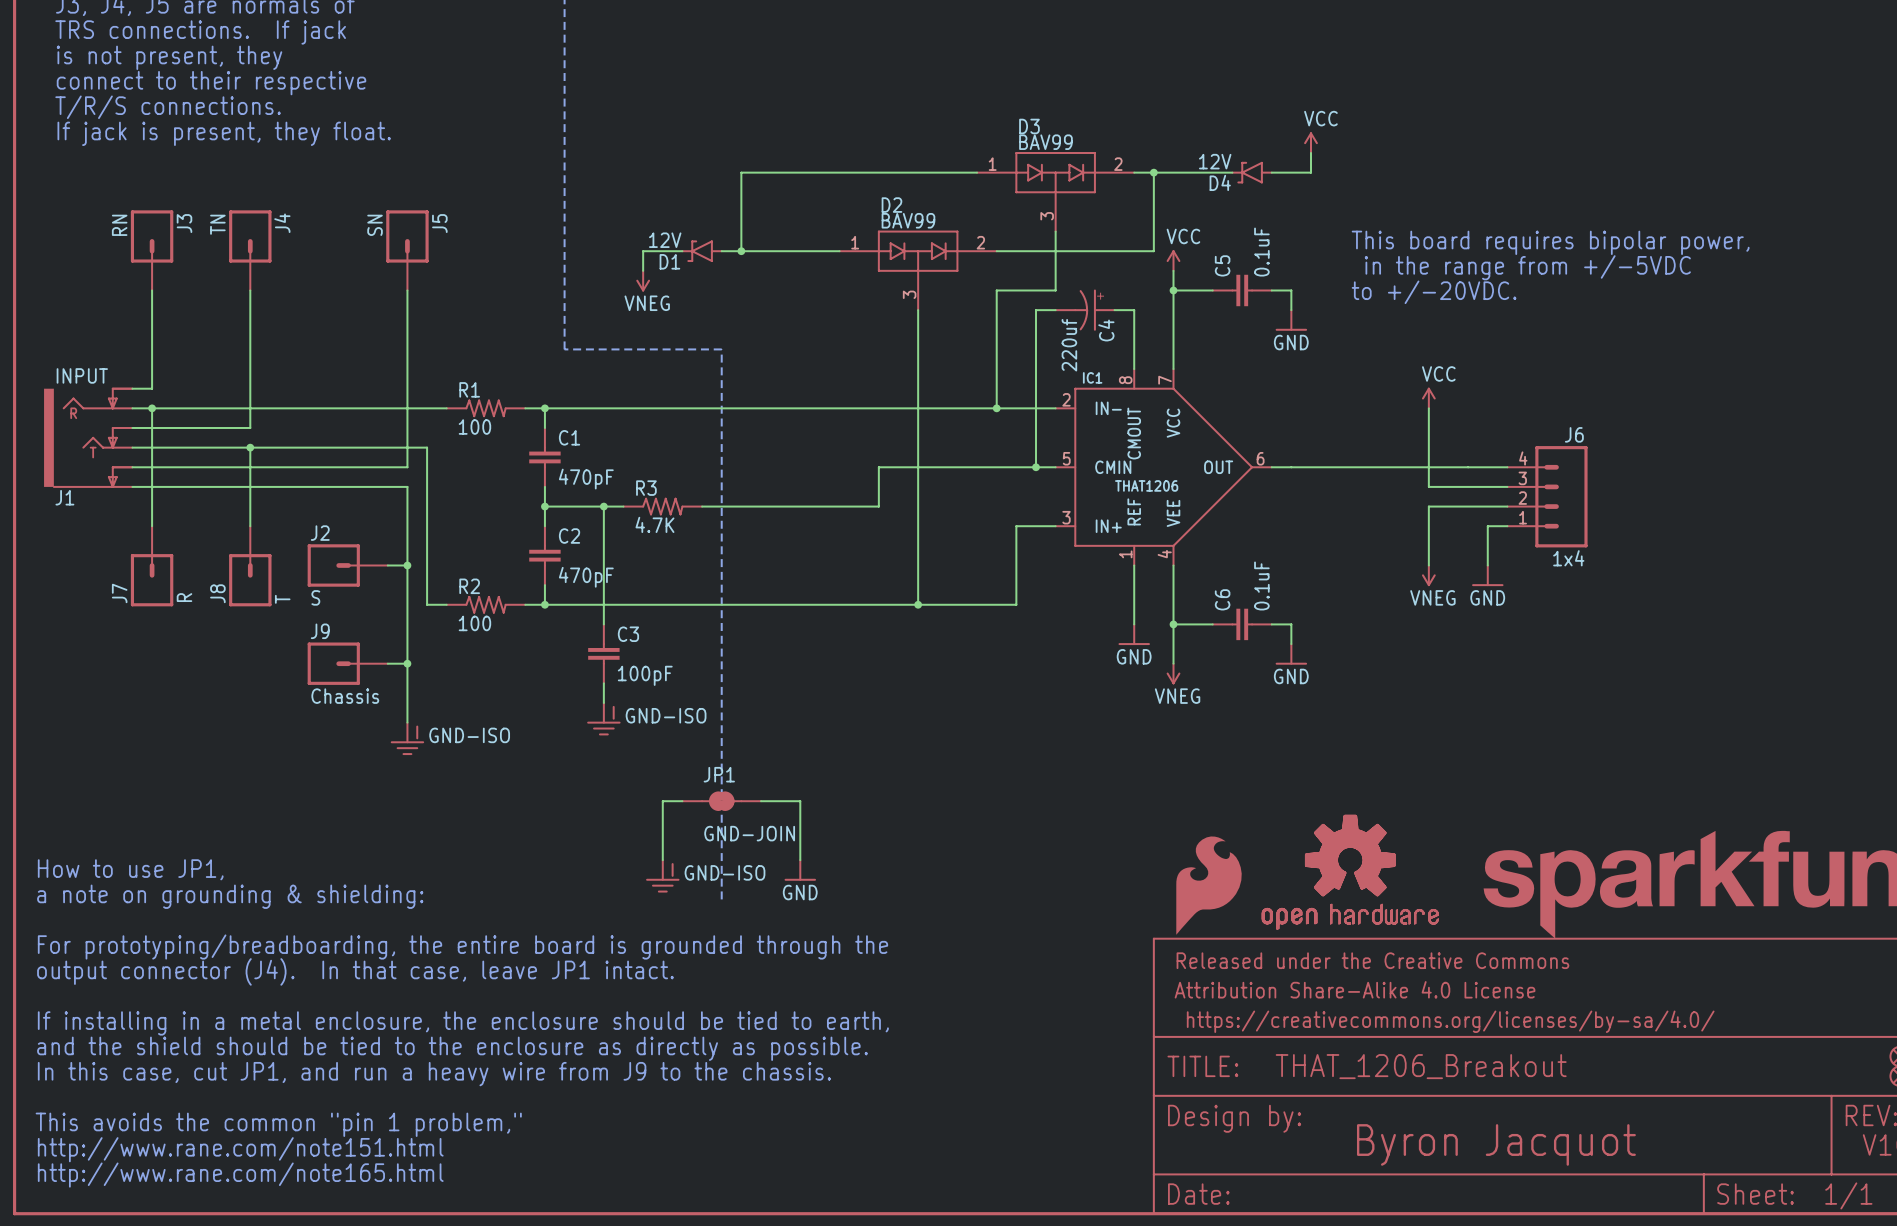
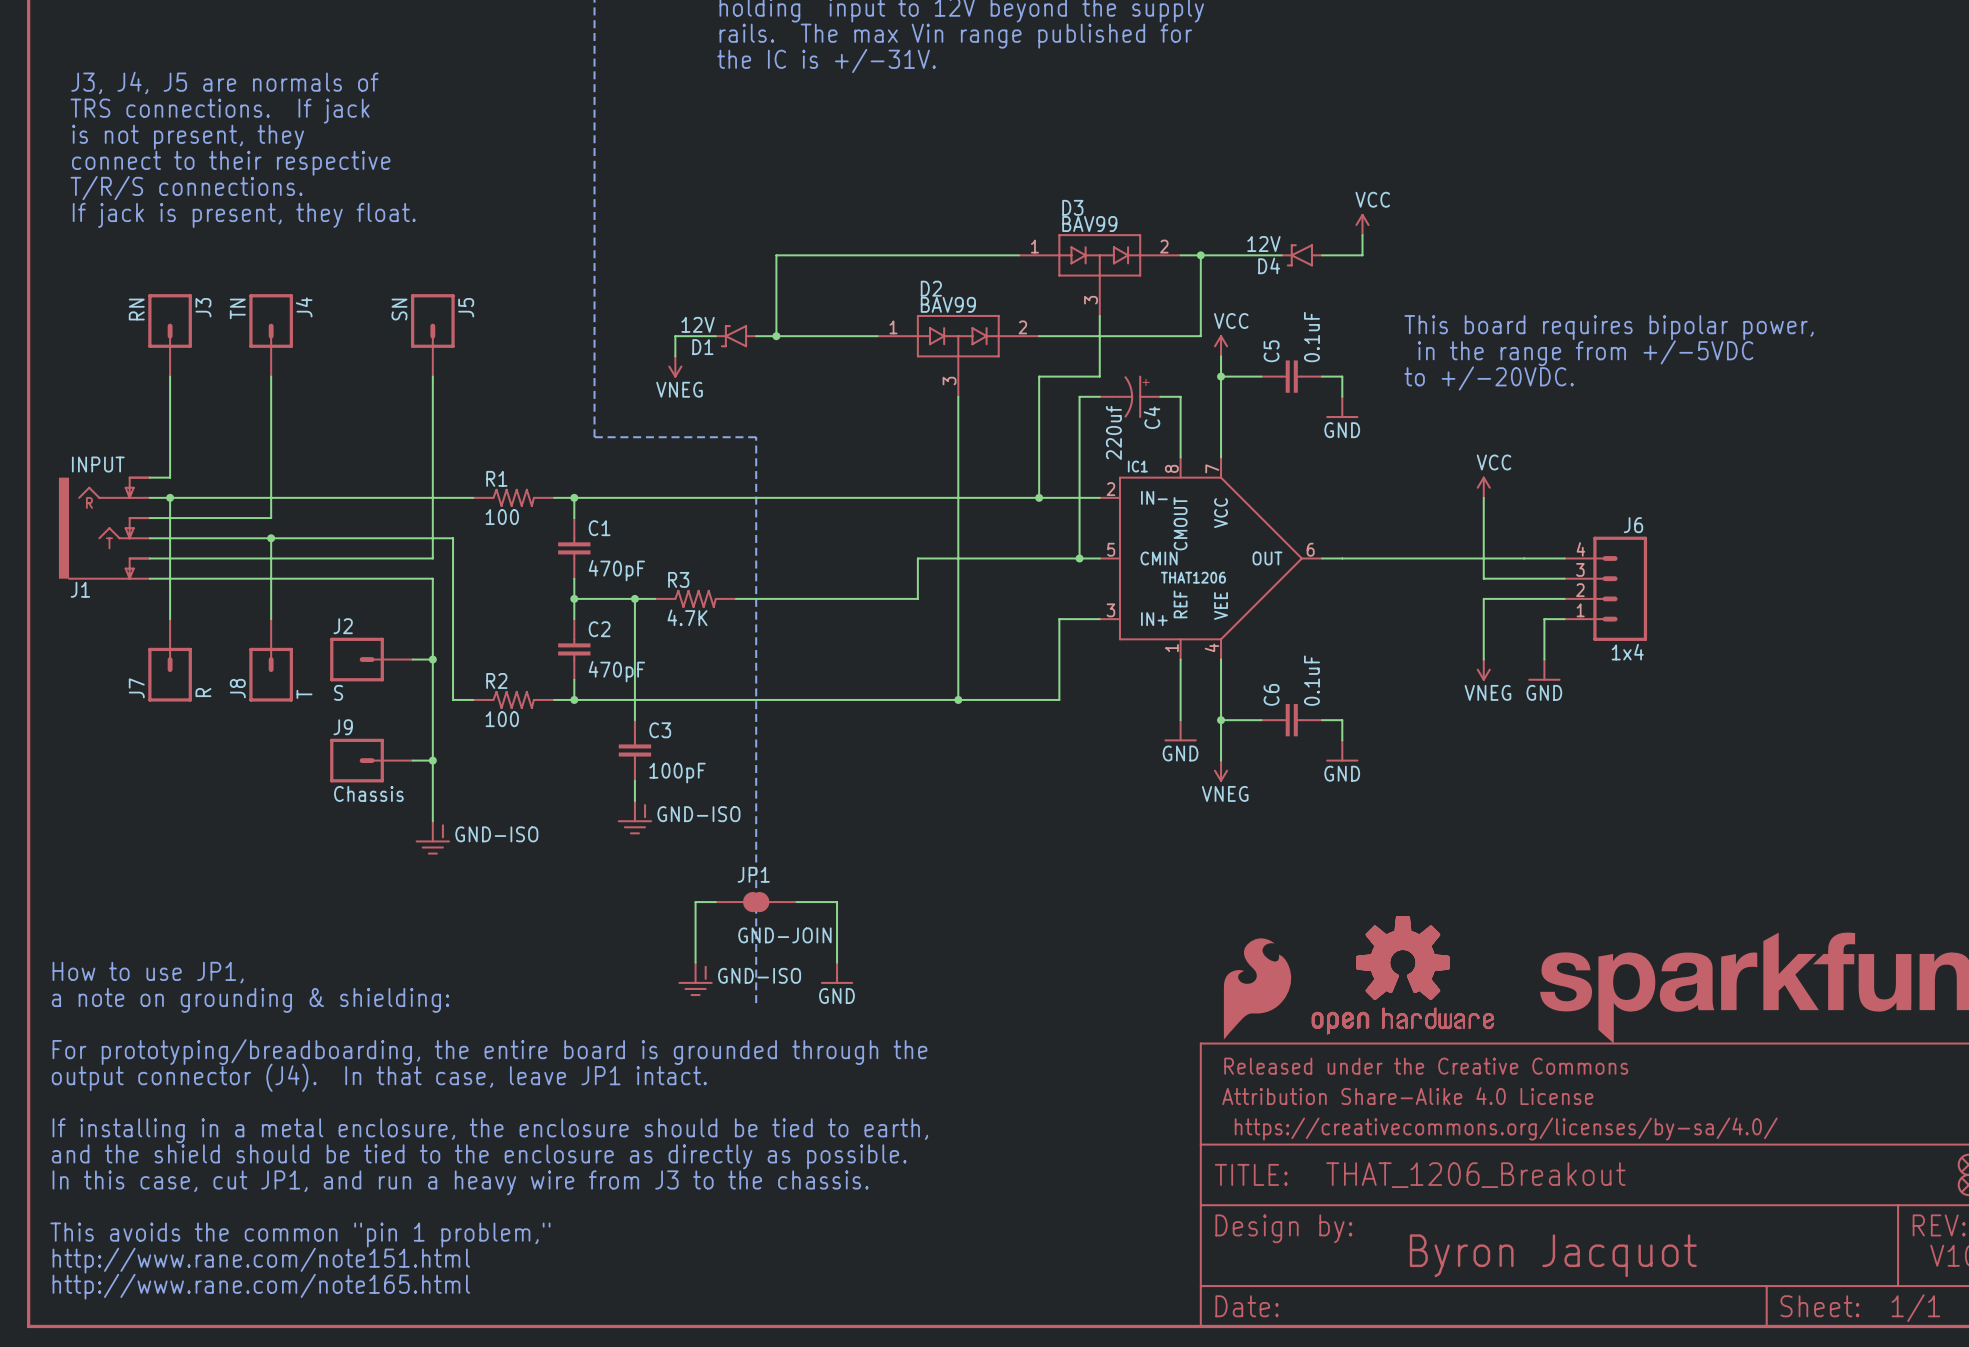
text: In this case, cut JP1, and run a heavy wire from J9 to the chassis. (434, 1074) -> In this case, cut JP1, and run a heavy wire from J3 to the chassis. (460, 1182)

